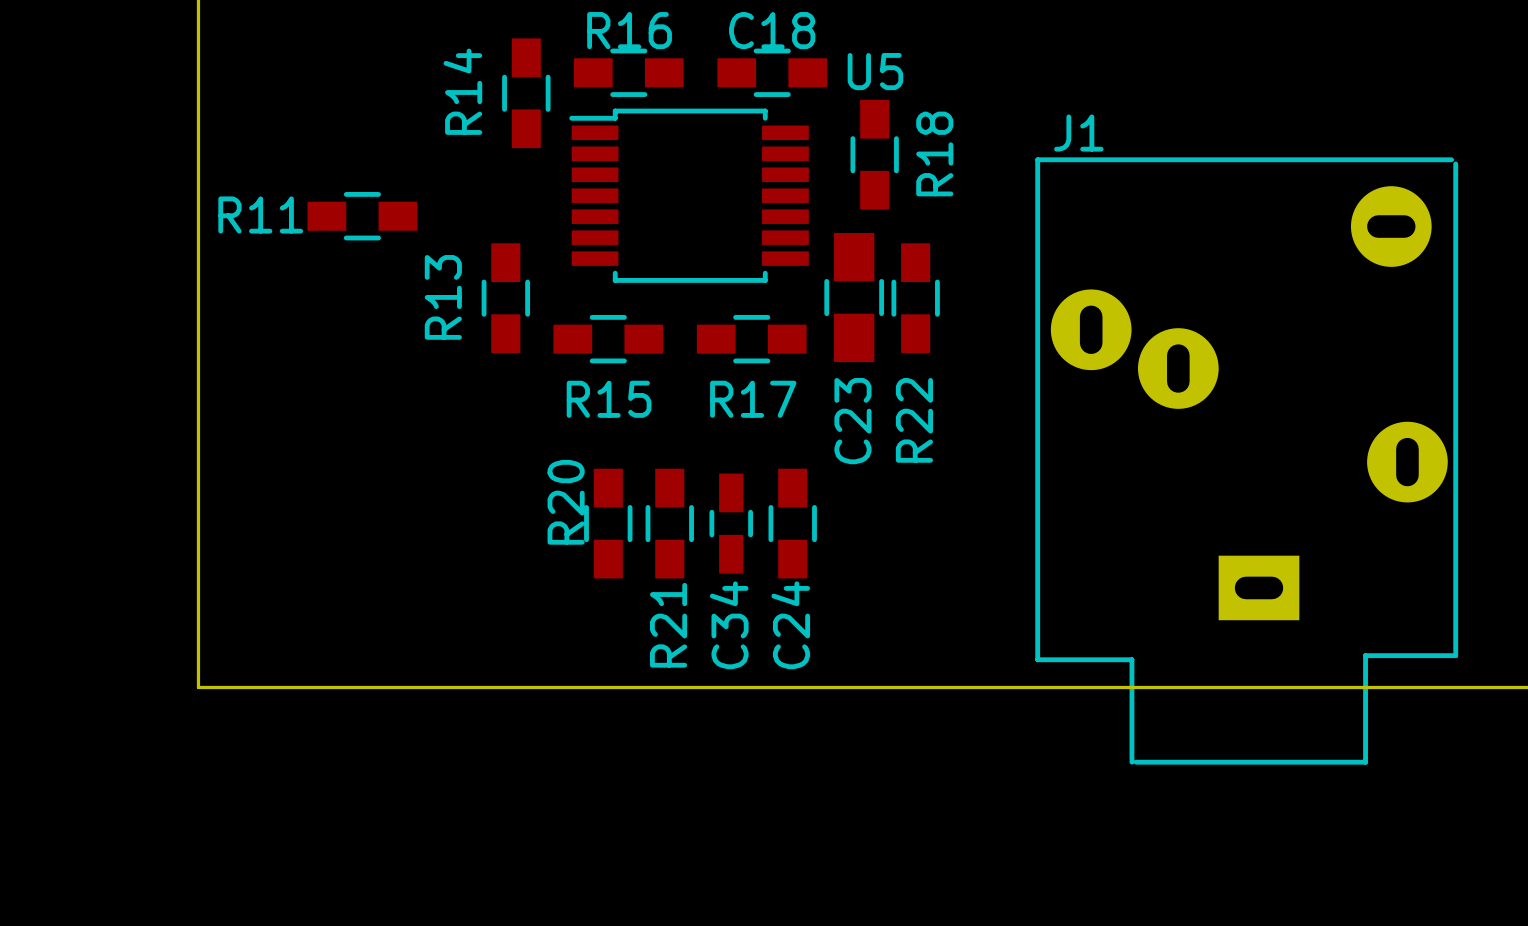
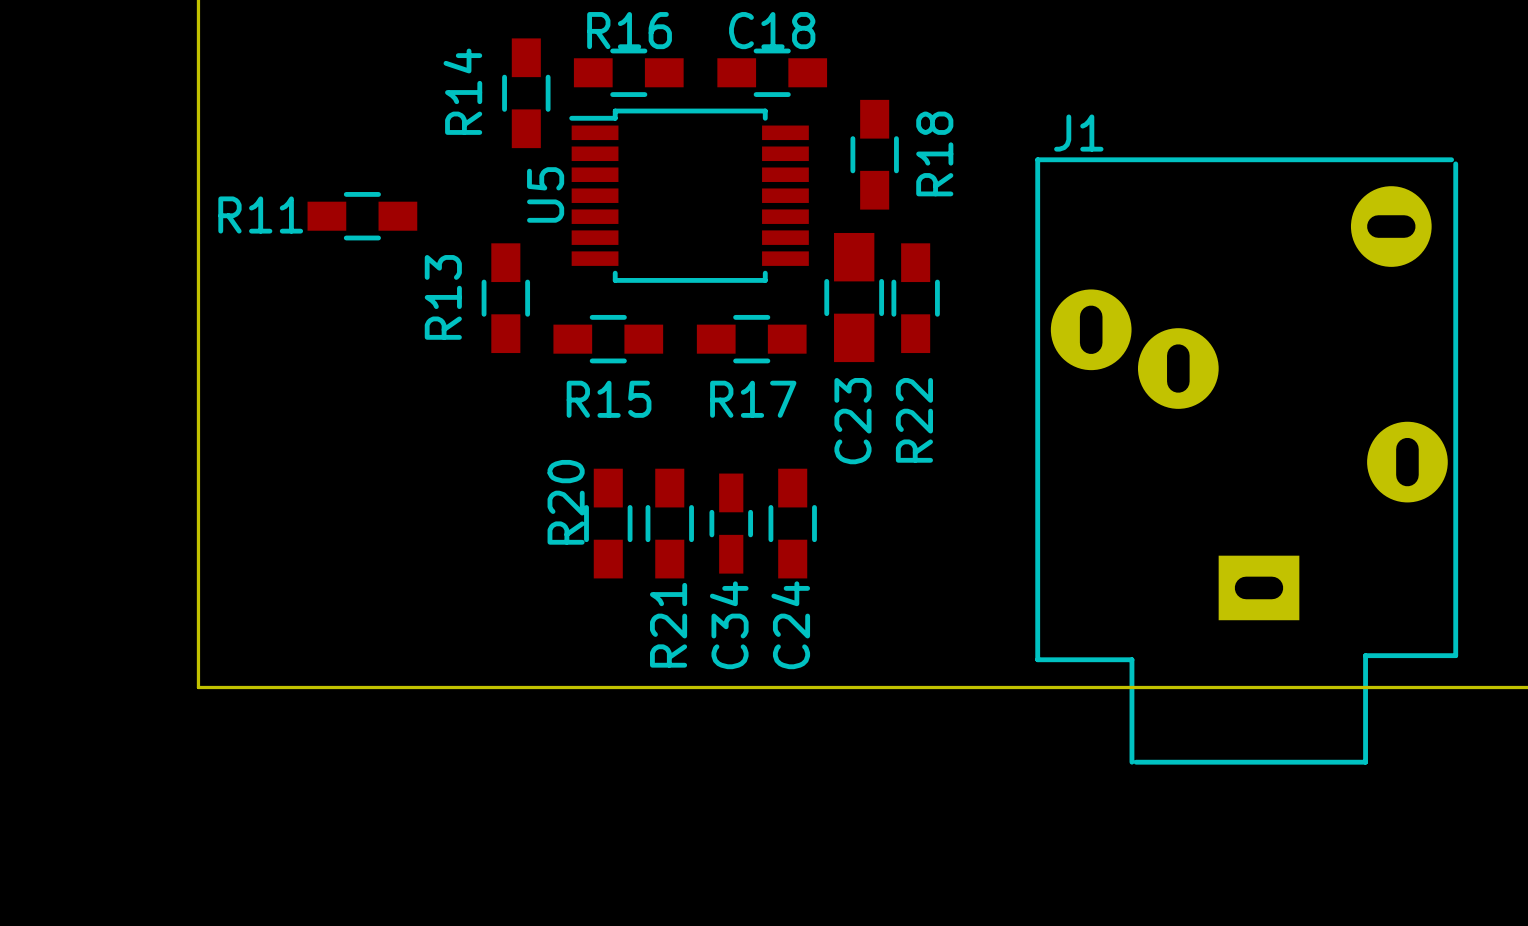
U5 name rotation: 0° (875, 71) -> 90° counterclockwise (545, 194)
U5 name position: U5 (875, 71) -> U5 (545, 194)

